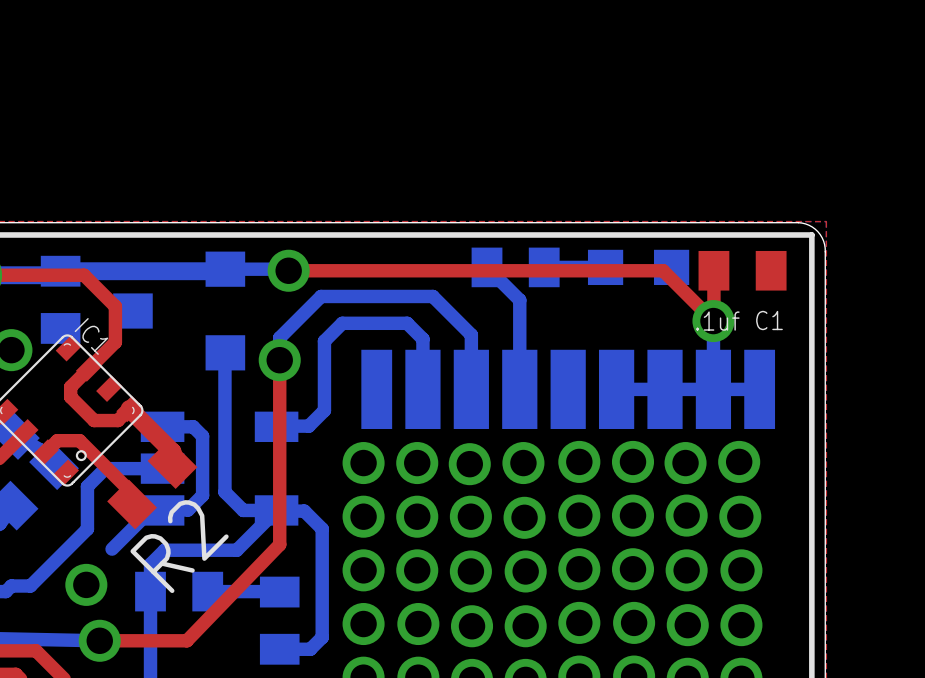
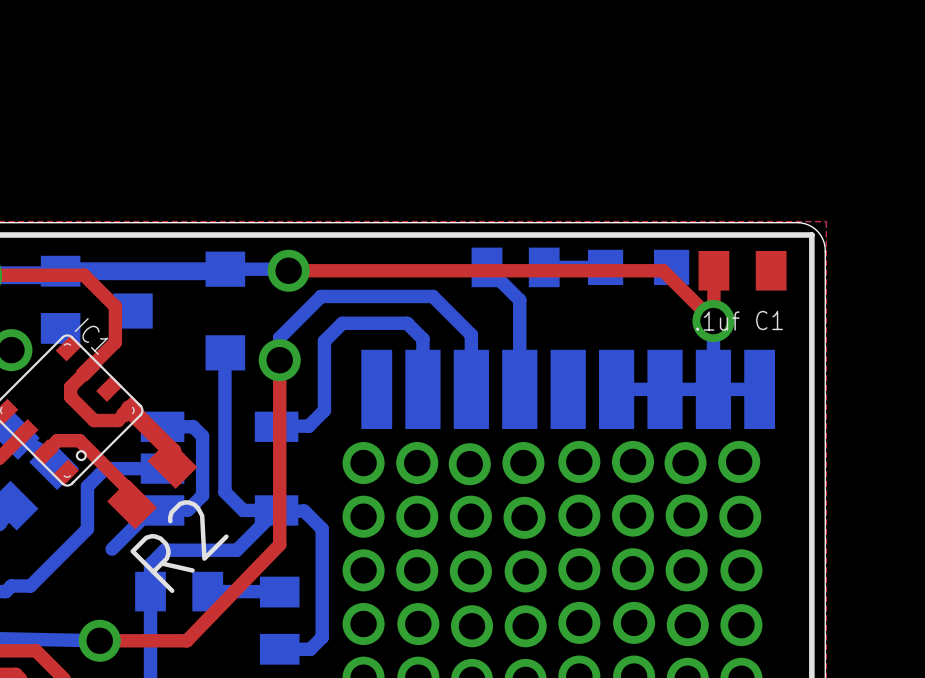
via: (86, 584) -> none

